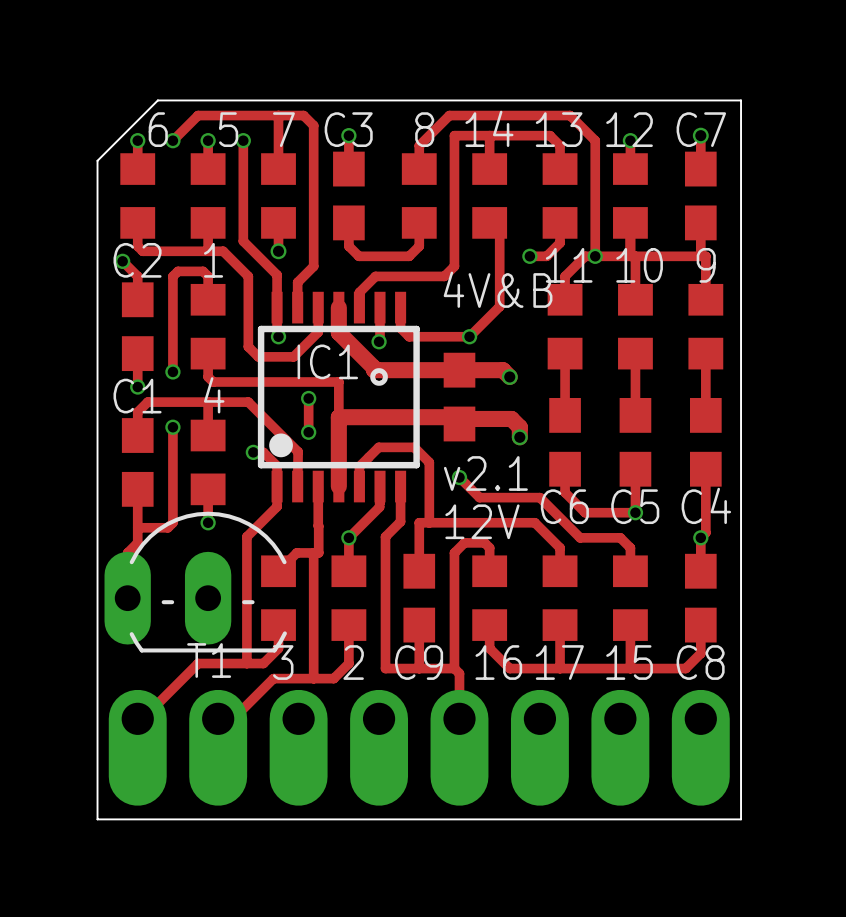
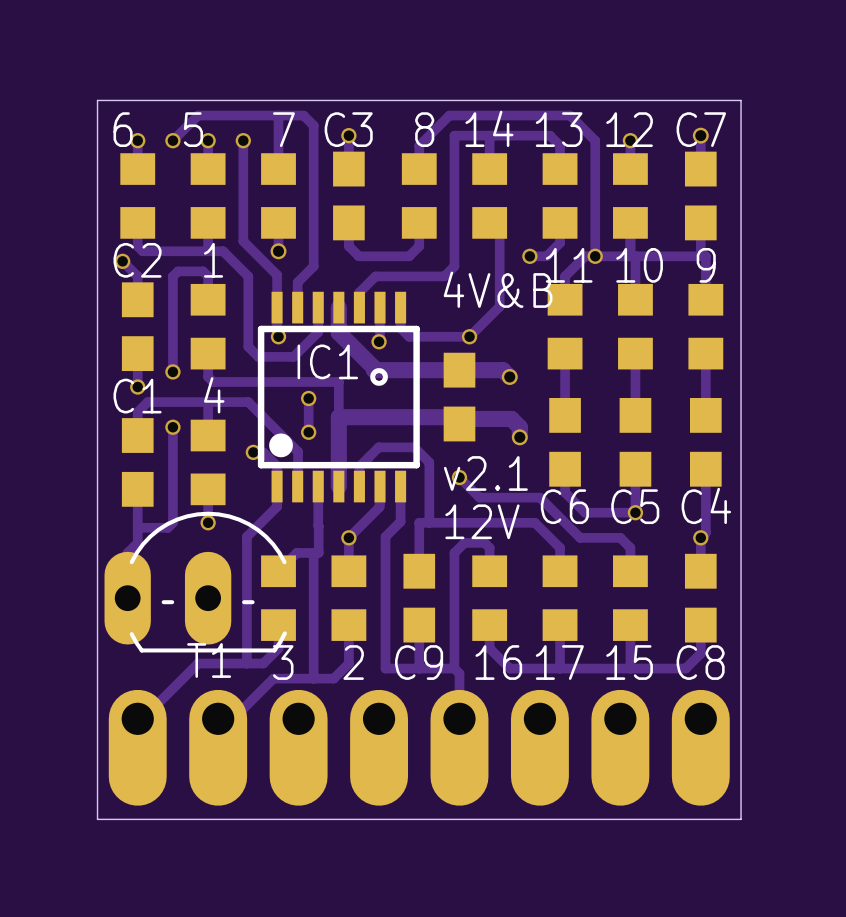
board edge: (157, 100) (97, 160) -> (157, 100) (97, 100) (97, 160)
6 name position: 6 (158, 129) -> 6 (123, 129)
5 name position: 5 (228, 129) -> 5 (193, 129)

